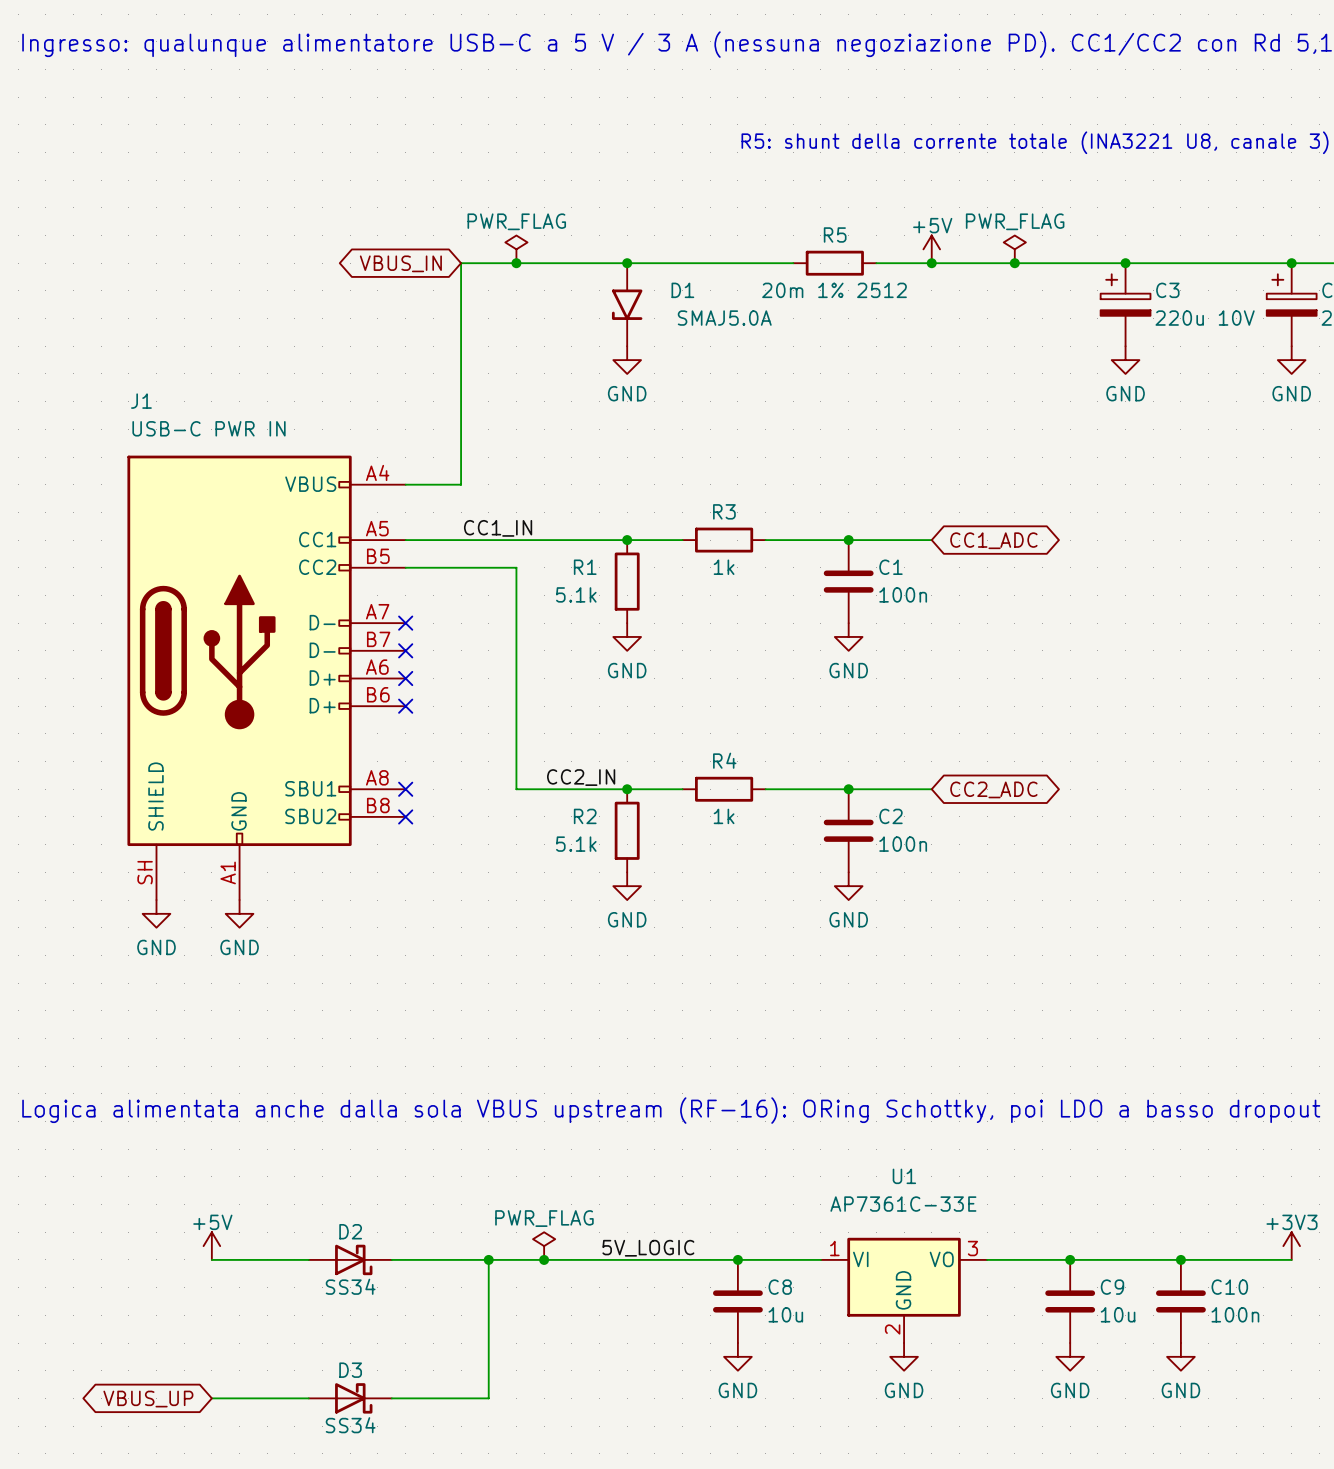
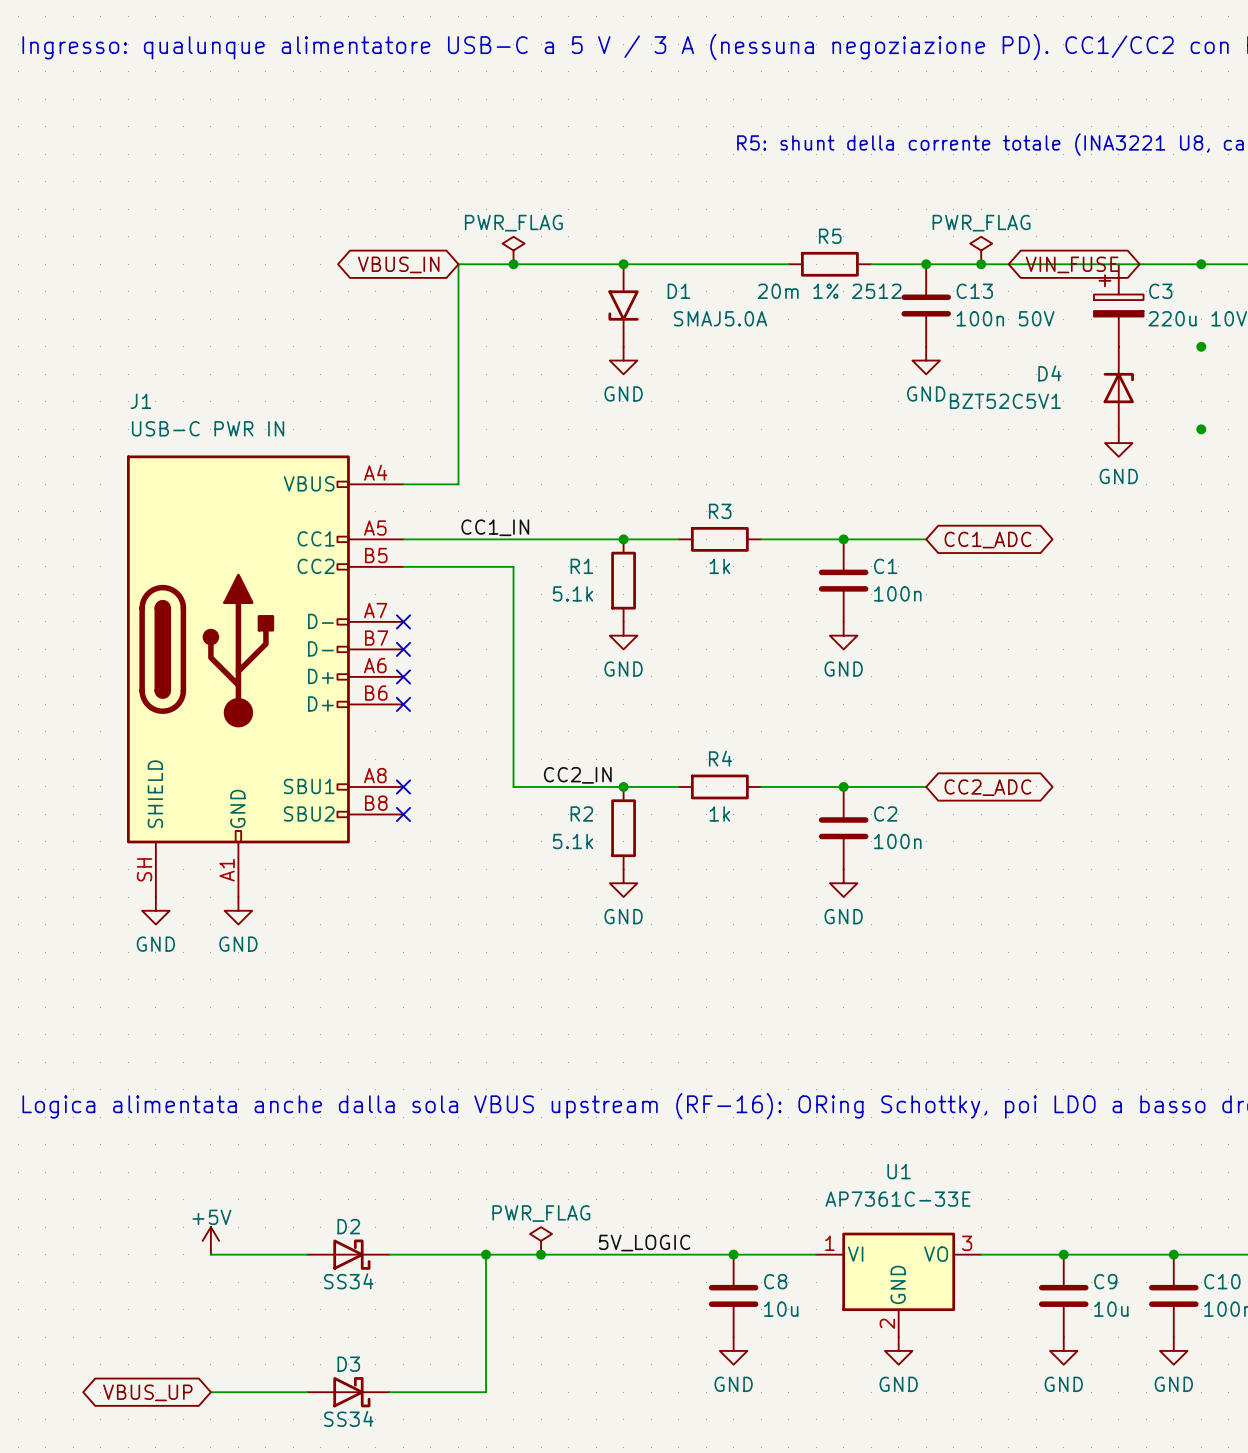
power symbol: +5V (931, 249) -> none
power symbol position: PWR_FLAG (1014, 249) -> PWR_FLAG (981, 250)
junction position: (1014, 263) -> (981, 264)
global label: none -> VIN_FUSE (1072, 264)
junction: (1125, 263) -> none
junction: none -> (1201, 264)
C13: none -> 100n 50V (926, 305)
junction: none -> (1201, 346)
power symbol: none -> GND (926, 360)
power symbol position: GND (1125, 360) -> GND (1118, 443)
D4: none -> BZT52C5V1 (1118, 388)
junction: none -> (1201, 429)

